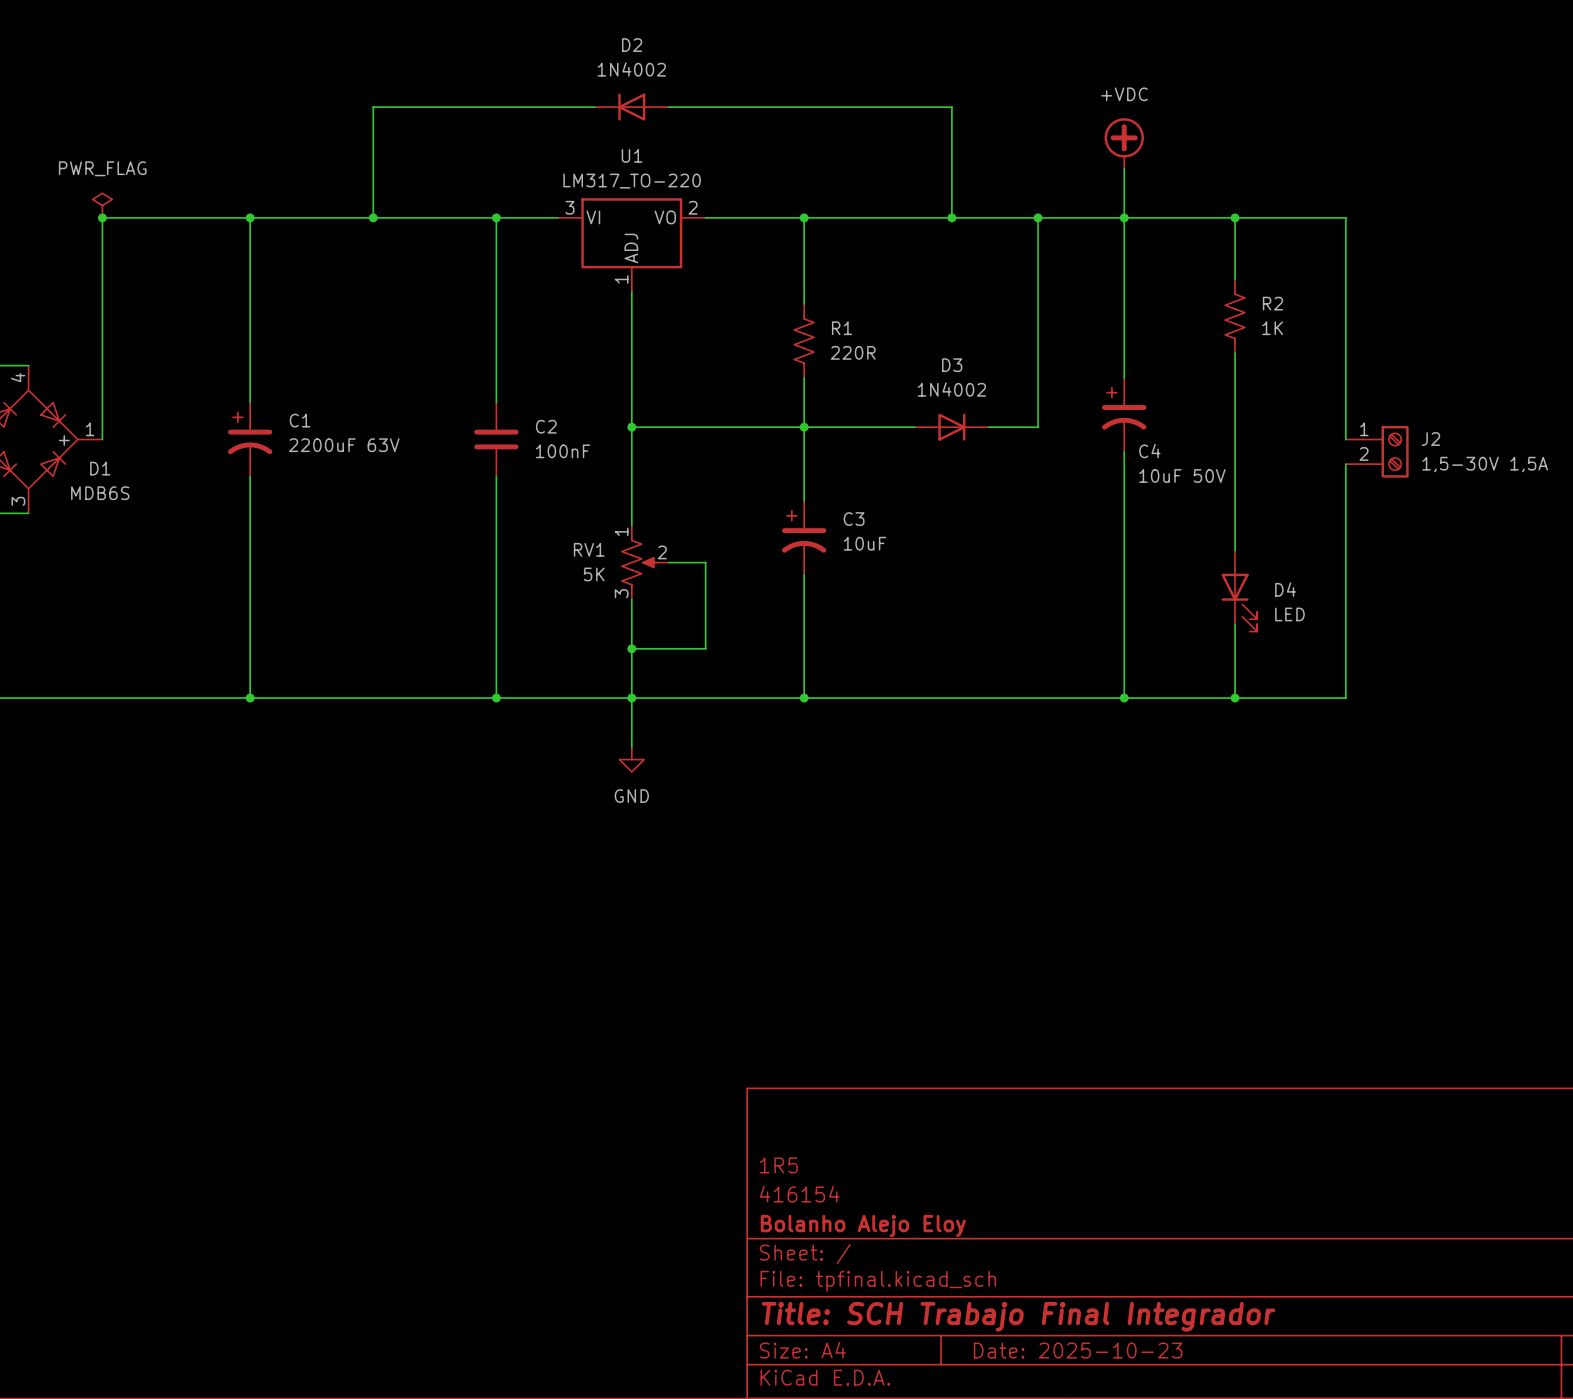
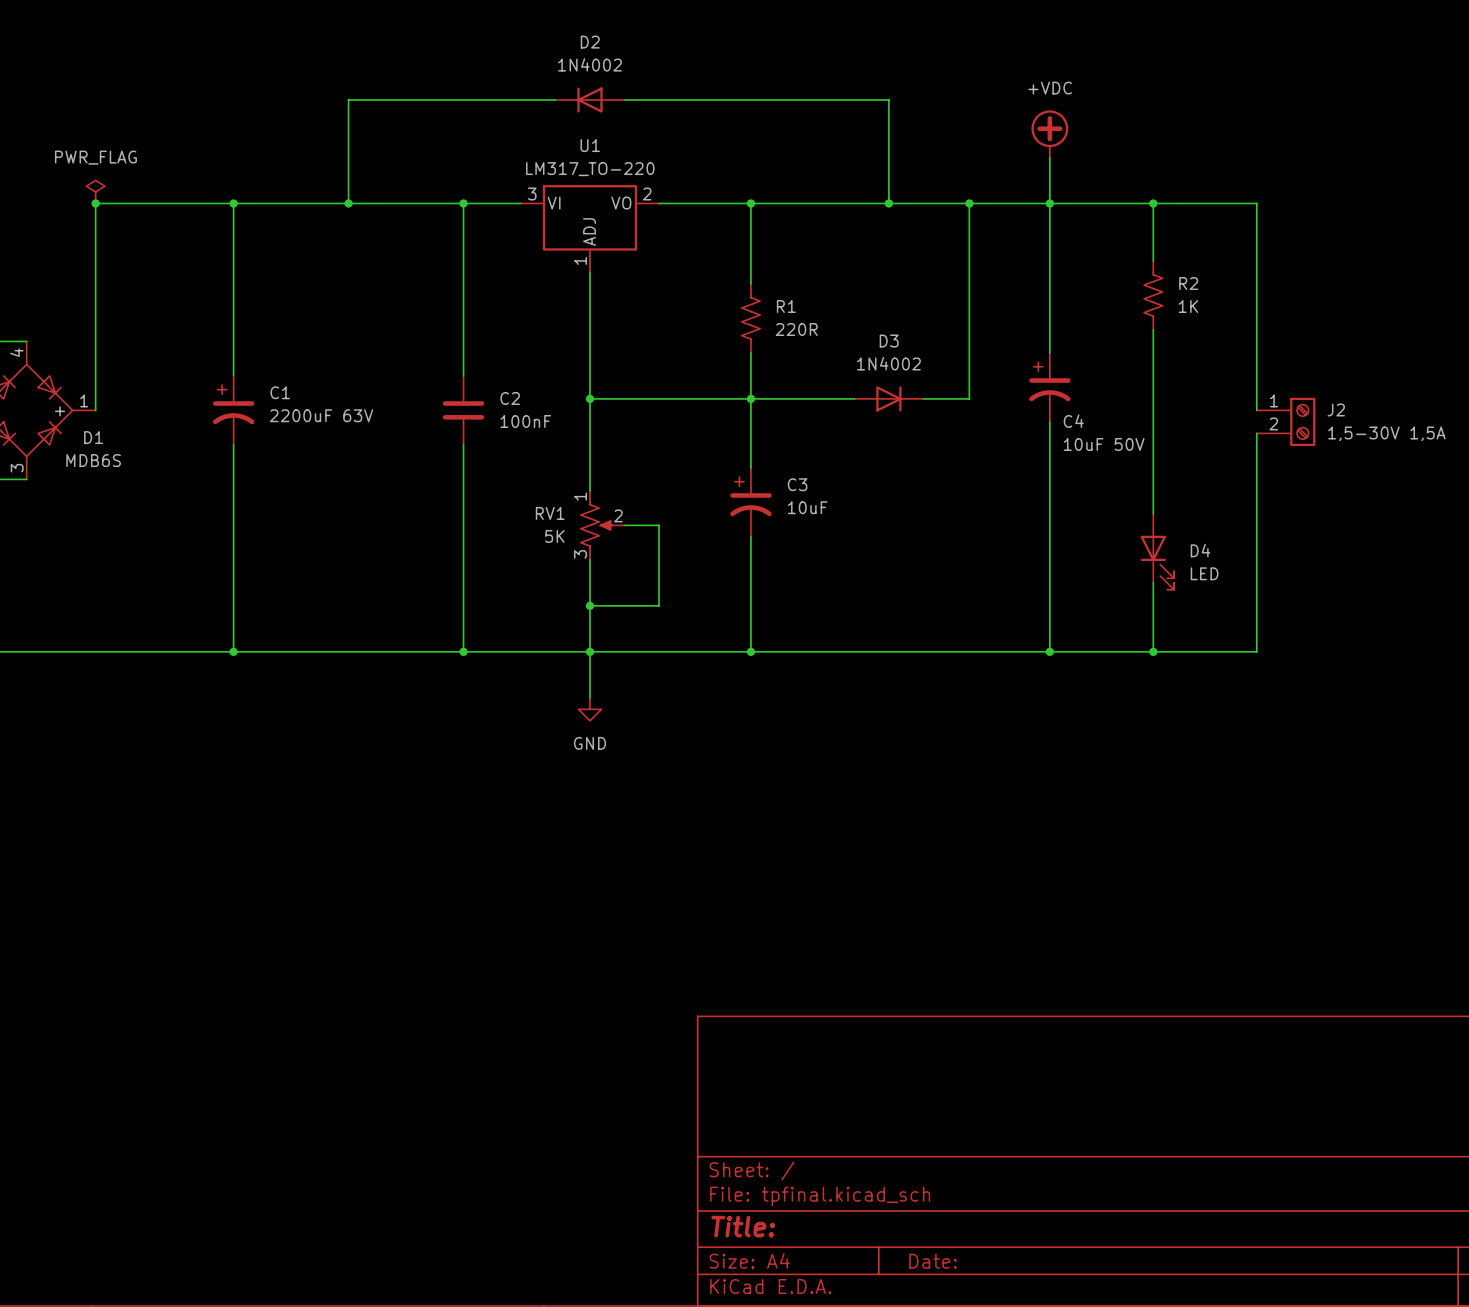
title block: 1R5 (778, 1165) -> none
title block: 416154 (799, 1194) -> none
title block: Bolanho Alejo Eloy (863, 1225) -> none
title block: Title: SCH Trabajo Final Integrador (1018, 1316) -> Title: (743, 1226)
title block: Date: 2025-10-23 (1078, 1350) -> Date: (933, 1261)

